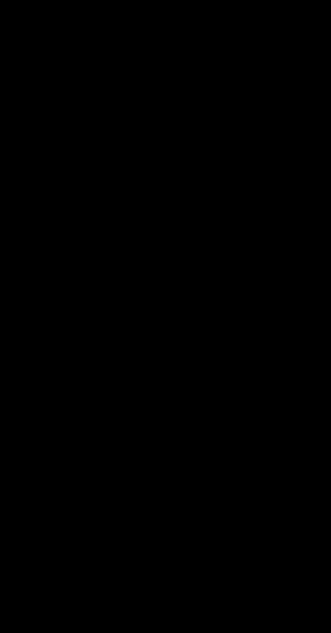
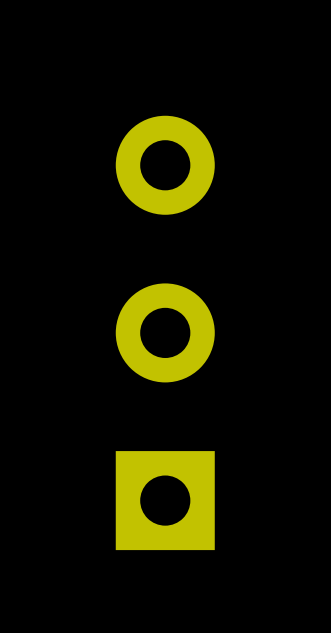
part: none -> (165, 332)

